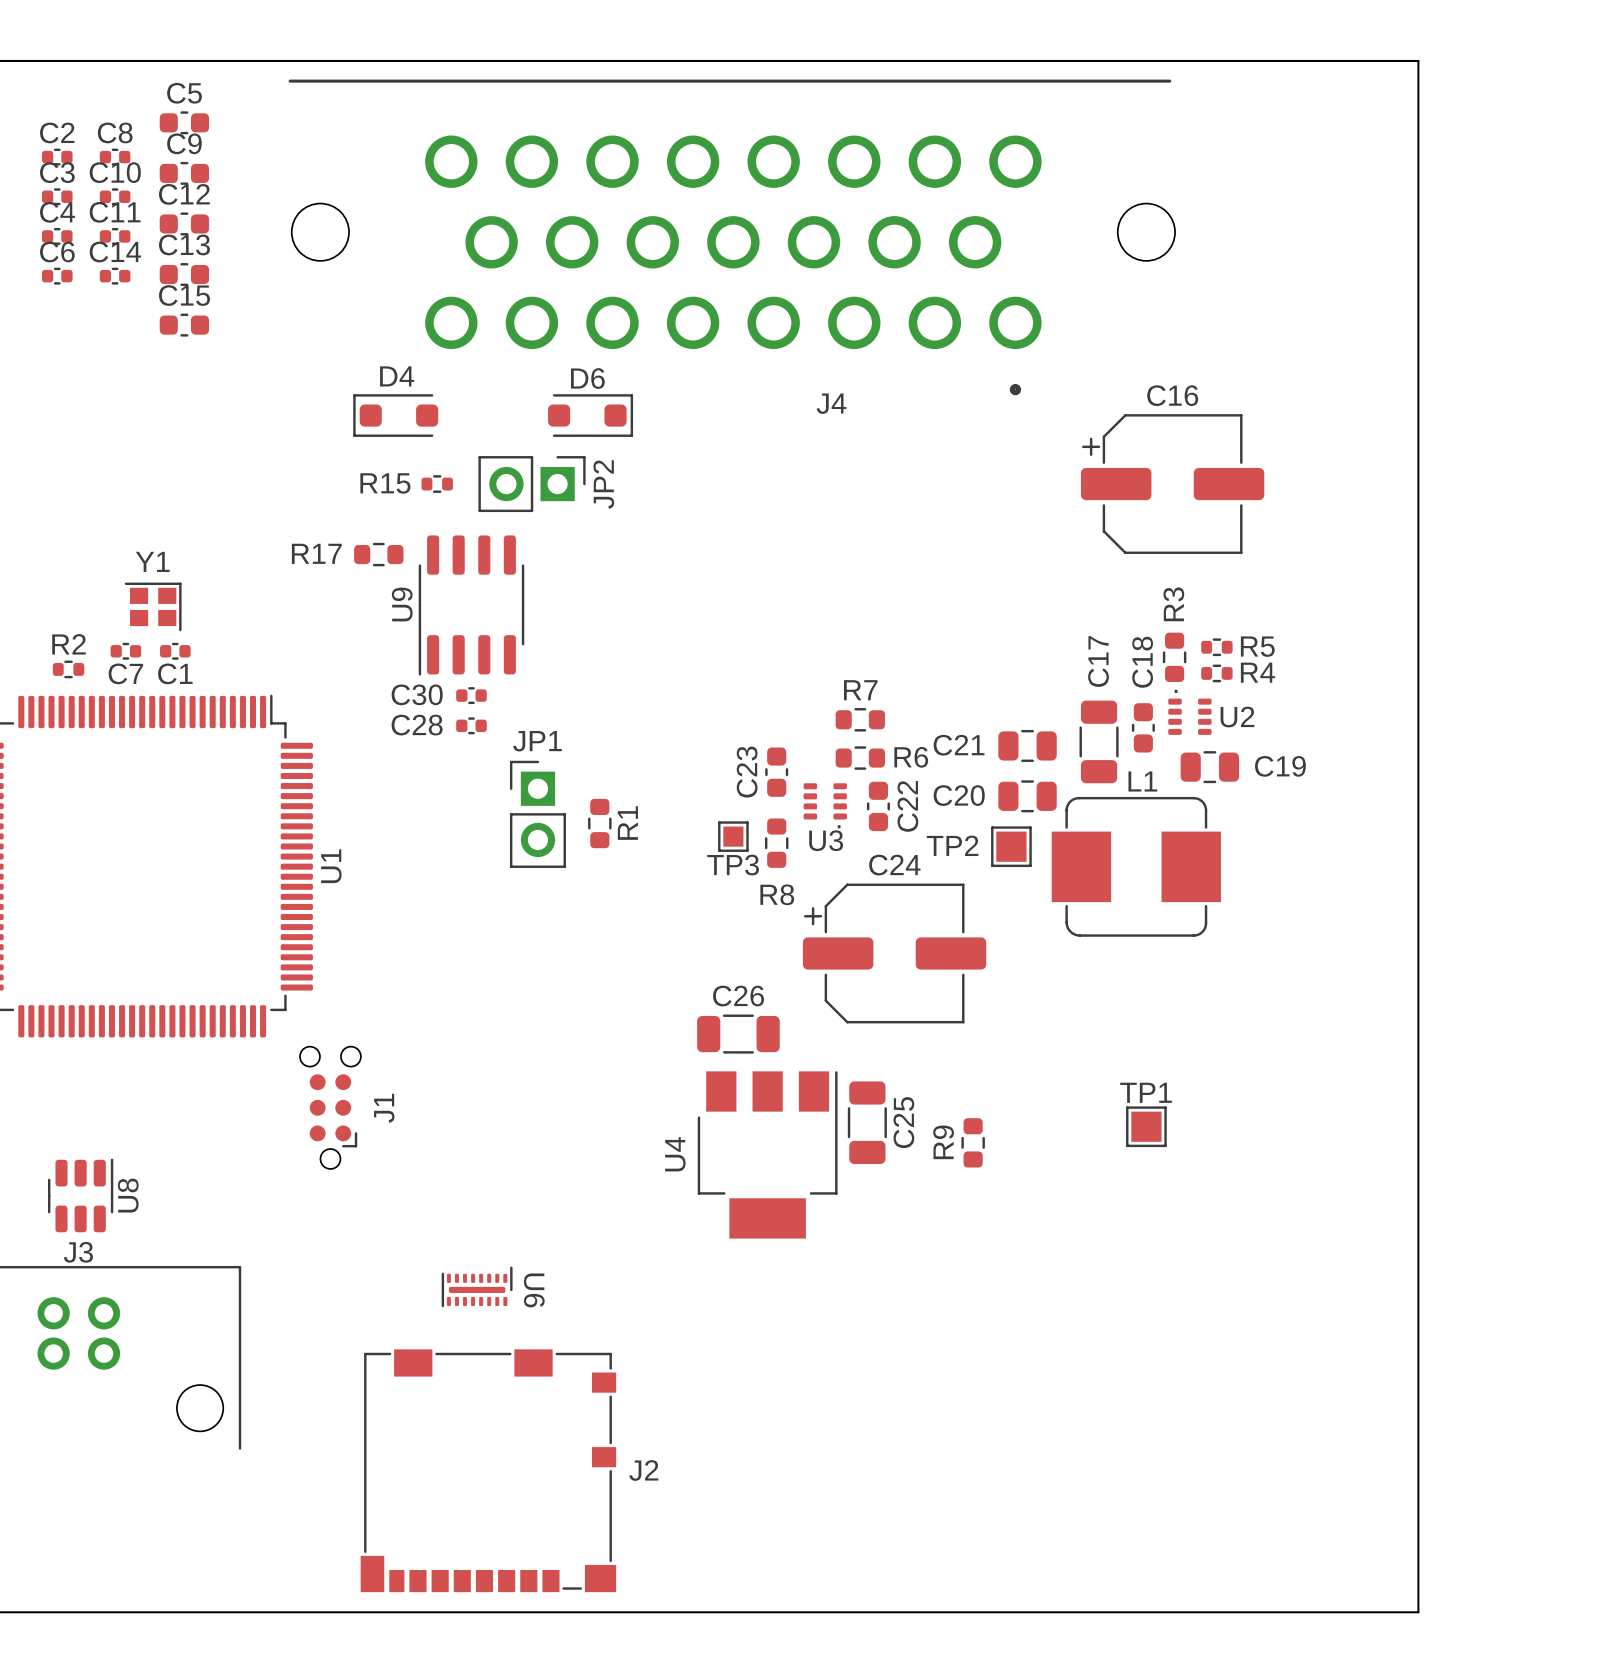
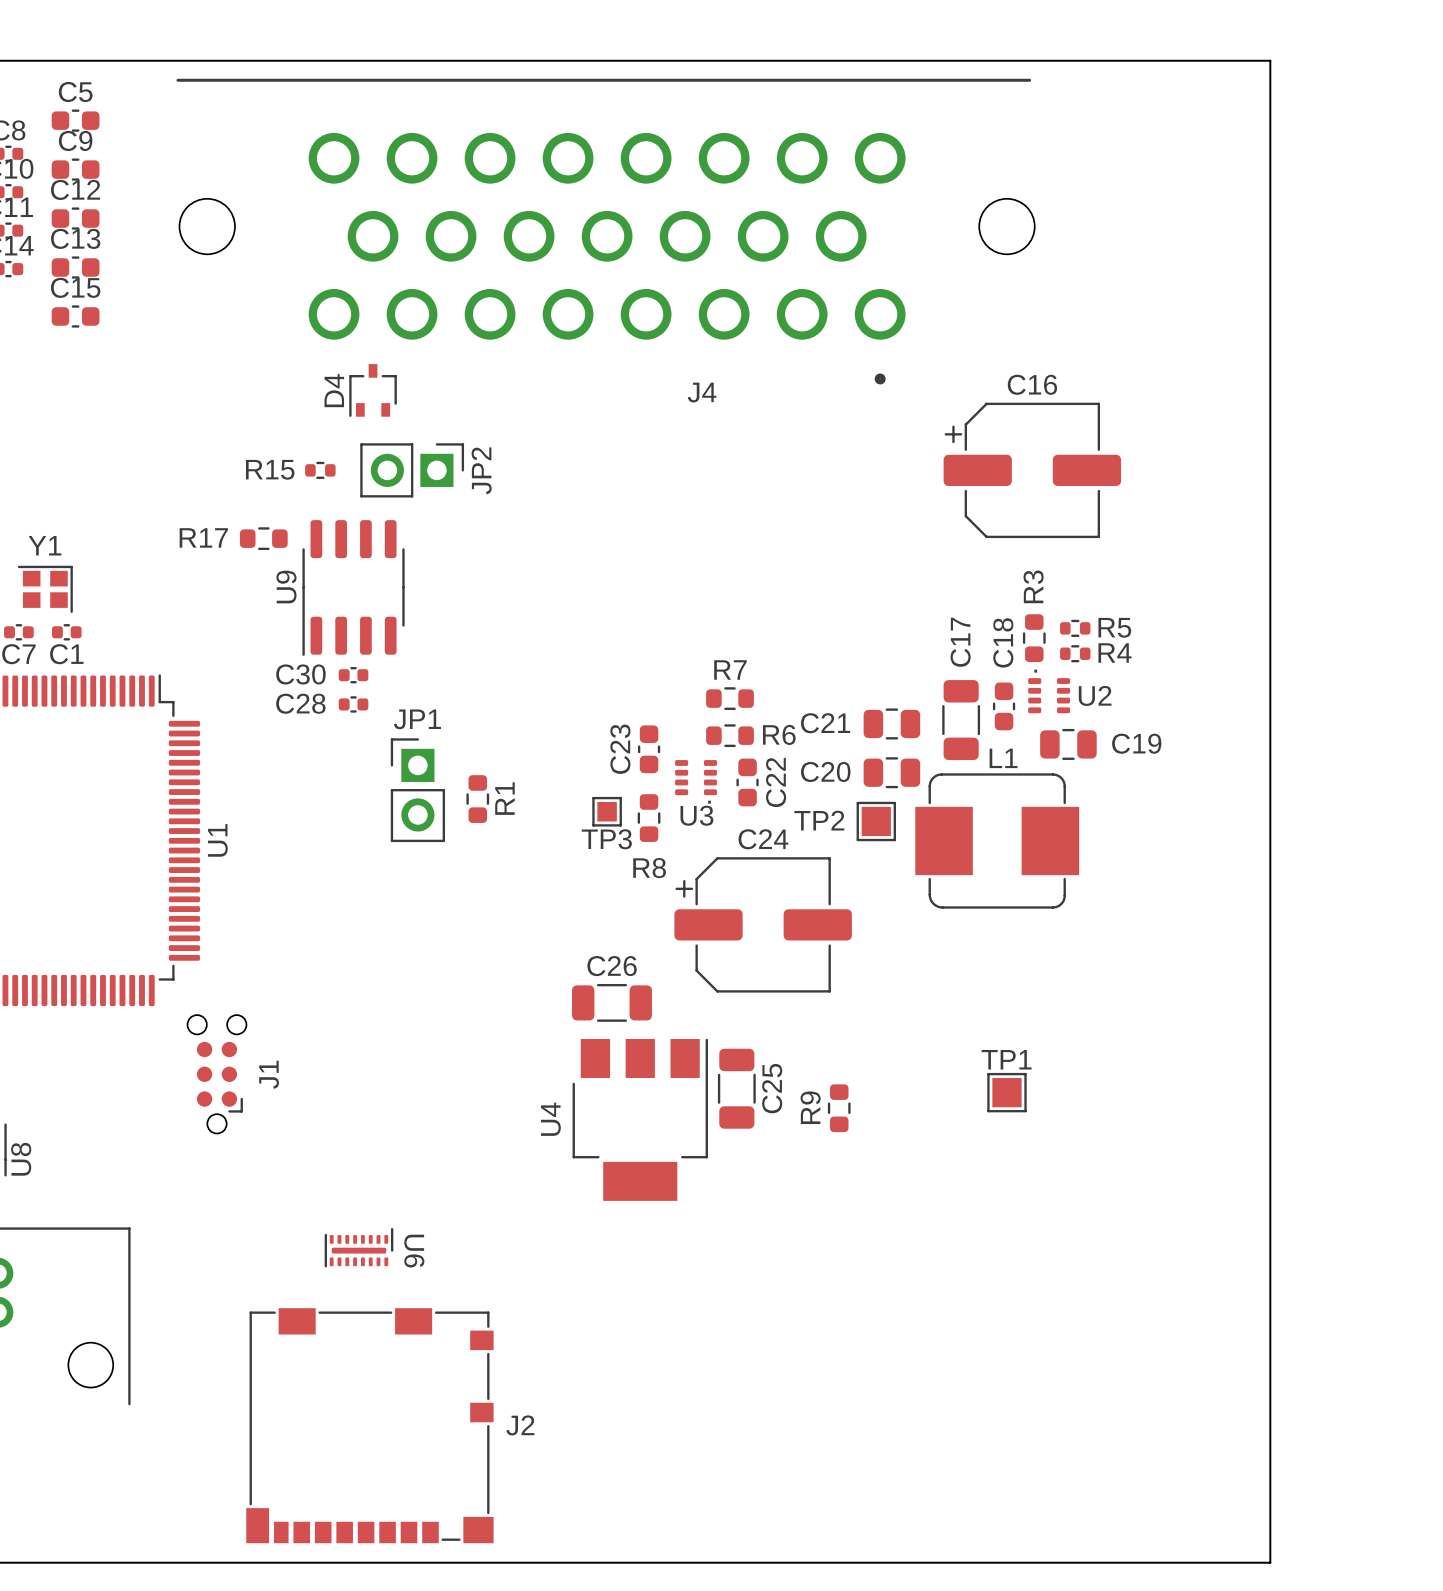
D4 name position: D4 (397, 376) -> D4 (334, 390)
D4 footprint: [353, 394, 439, 437] -> [349, 364, 397, 417]
D6: (590, 415) -> none

